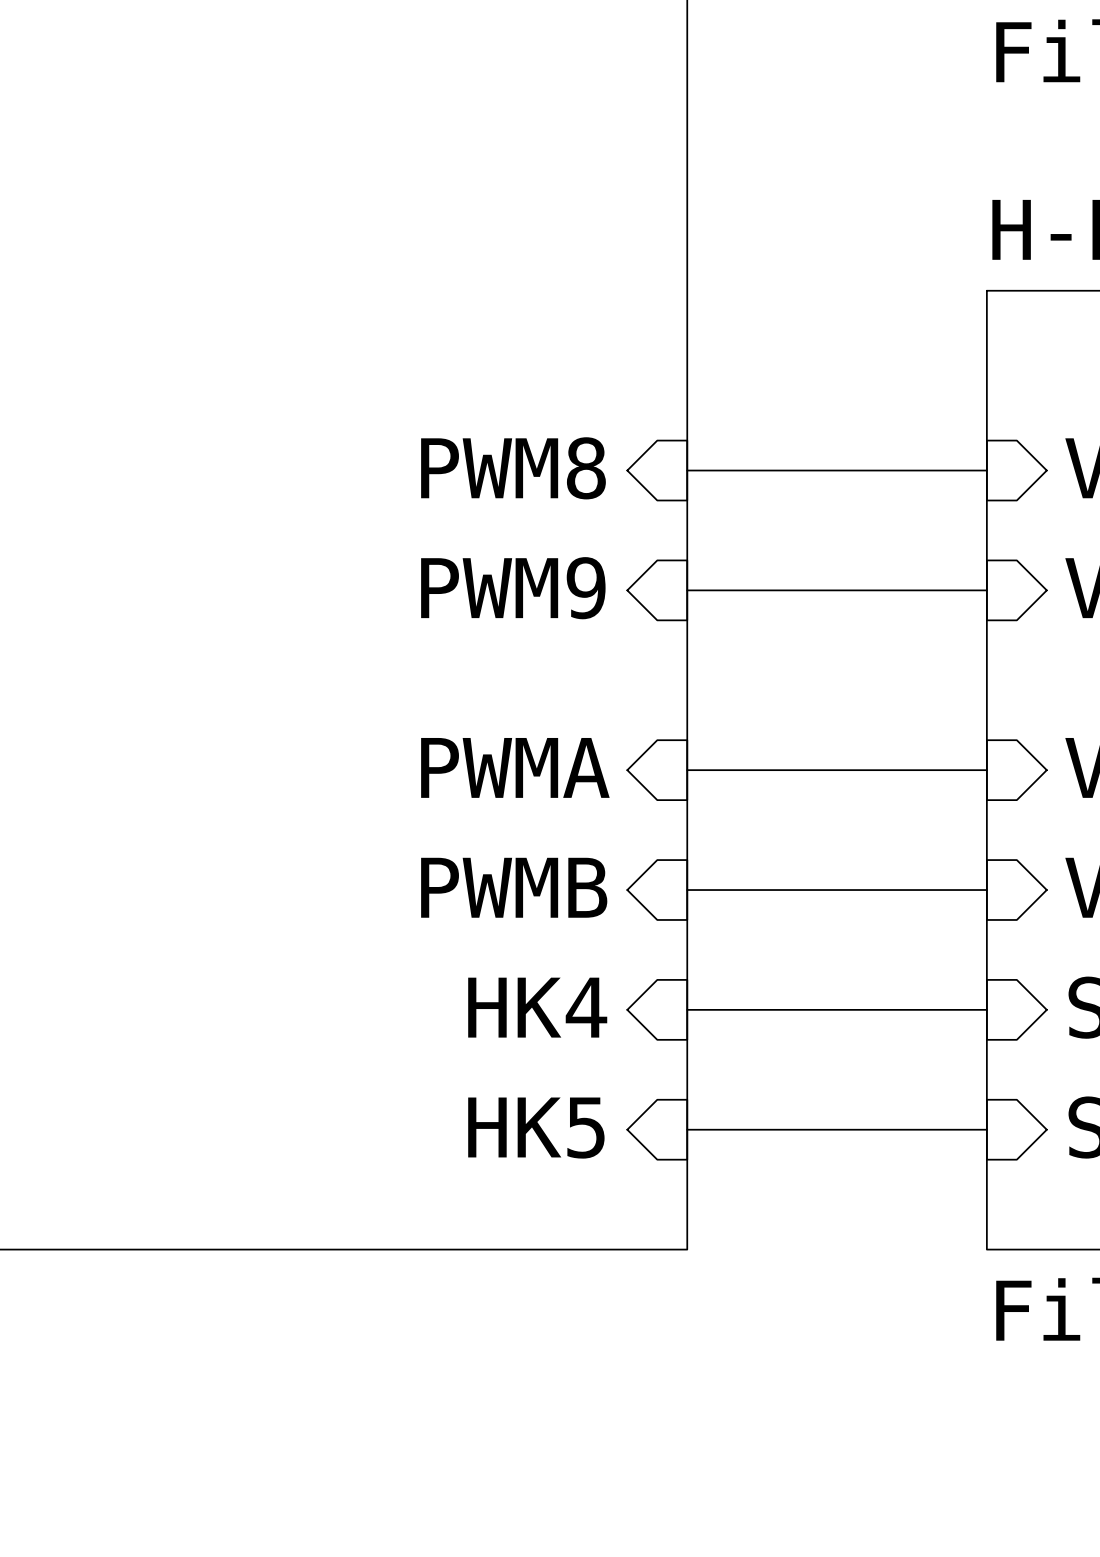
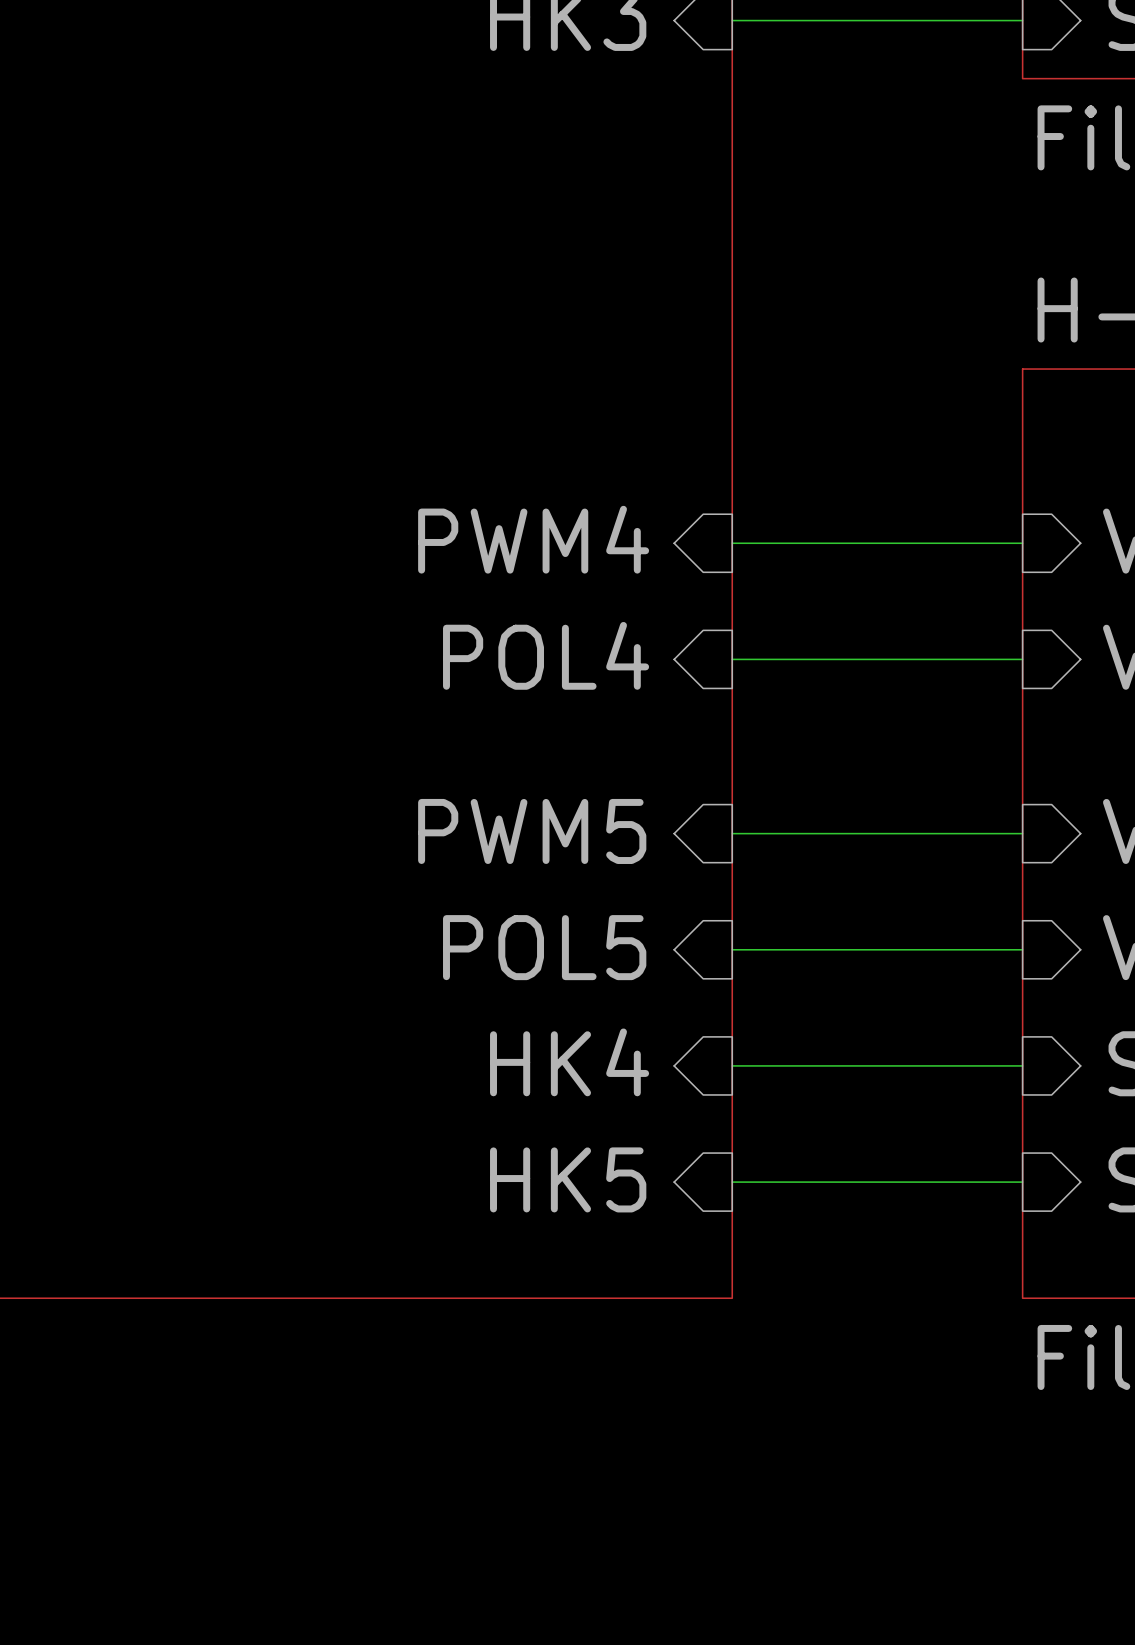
sheet pin: PWM8 (513, 468) -> PWM4 (533, 539)
sheet pin: PWM9 (513, 588) -> POL4 (546, 655)
sheet pin: PWMA (515, 767) -> PWM5 (532, 831)
sheet pin: PWMB (514, 887) -> POL5 (544, 947)

